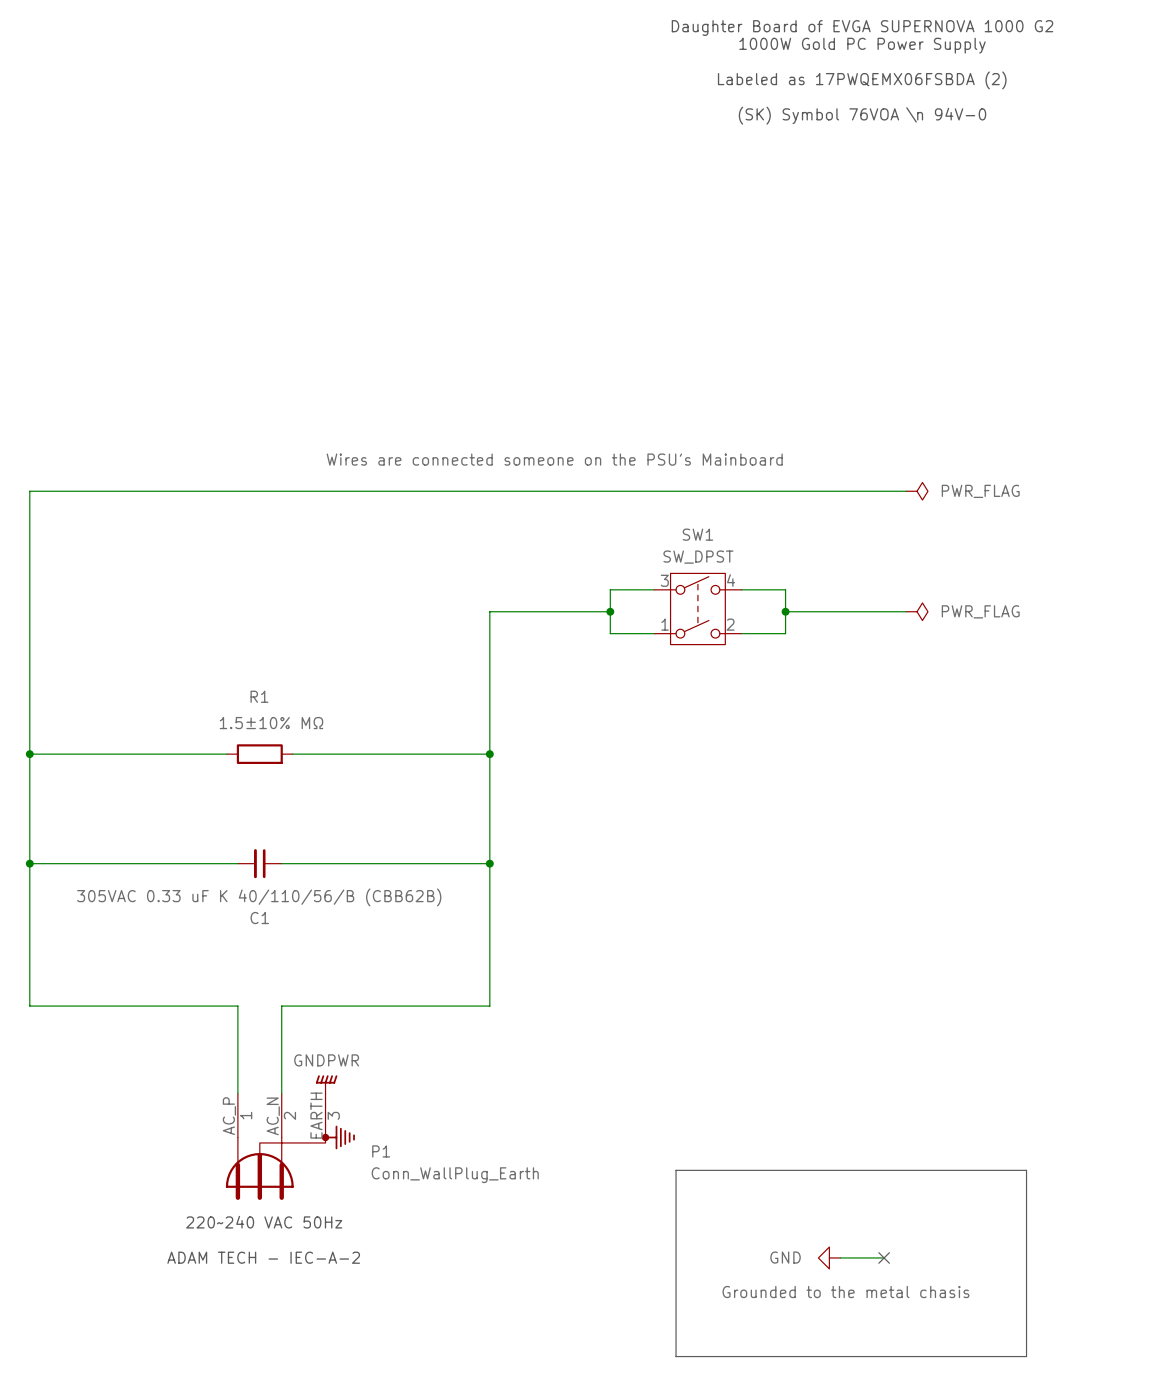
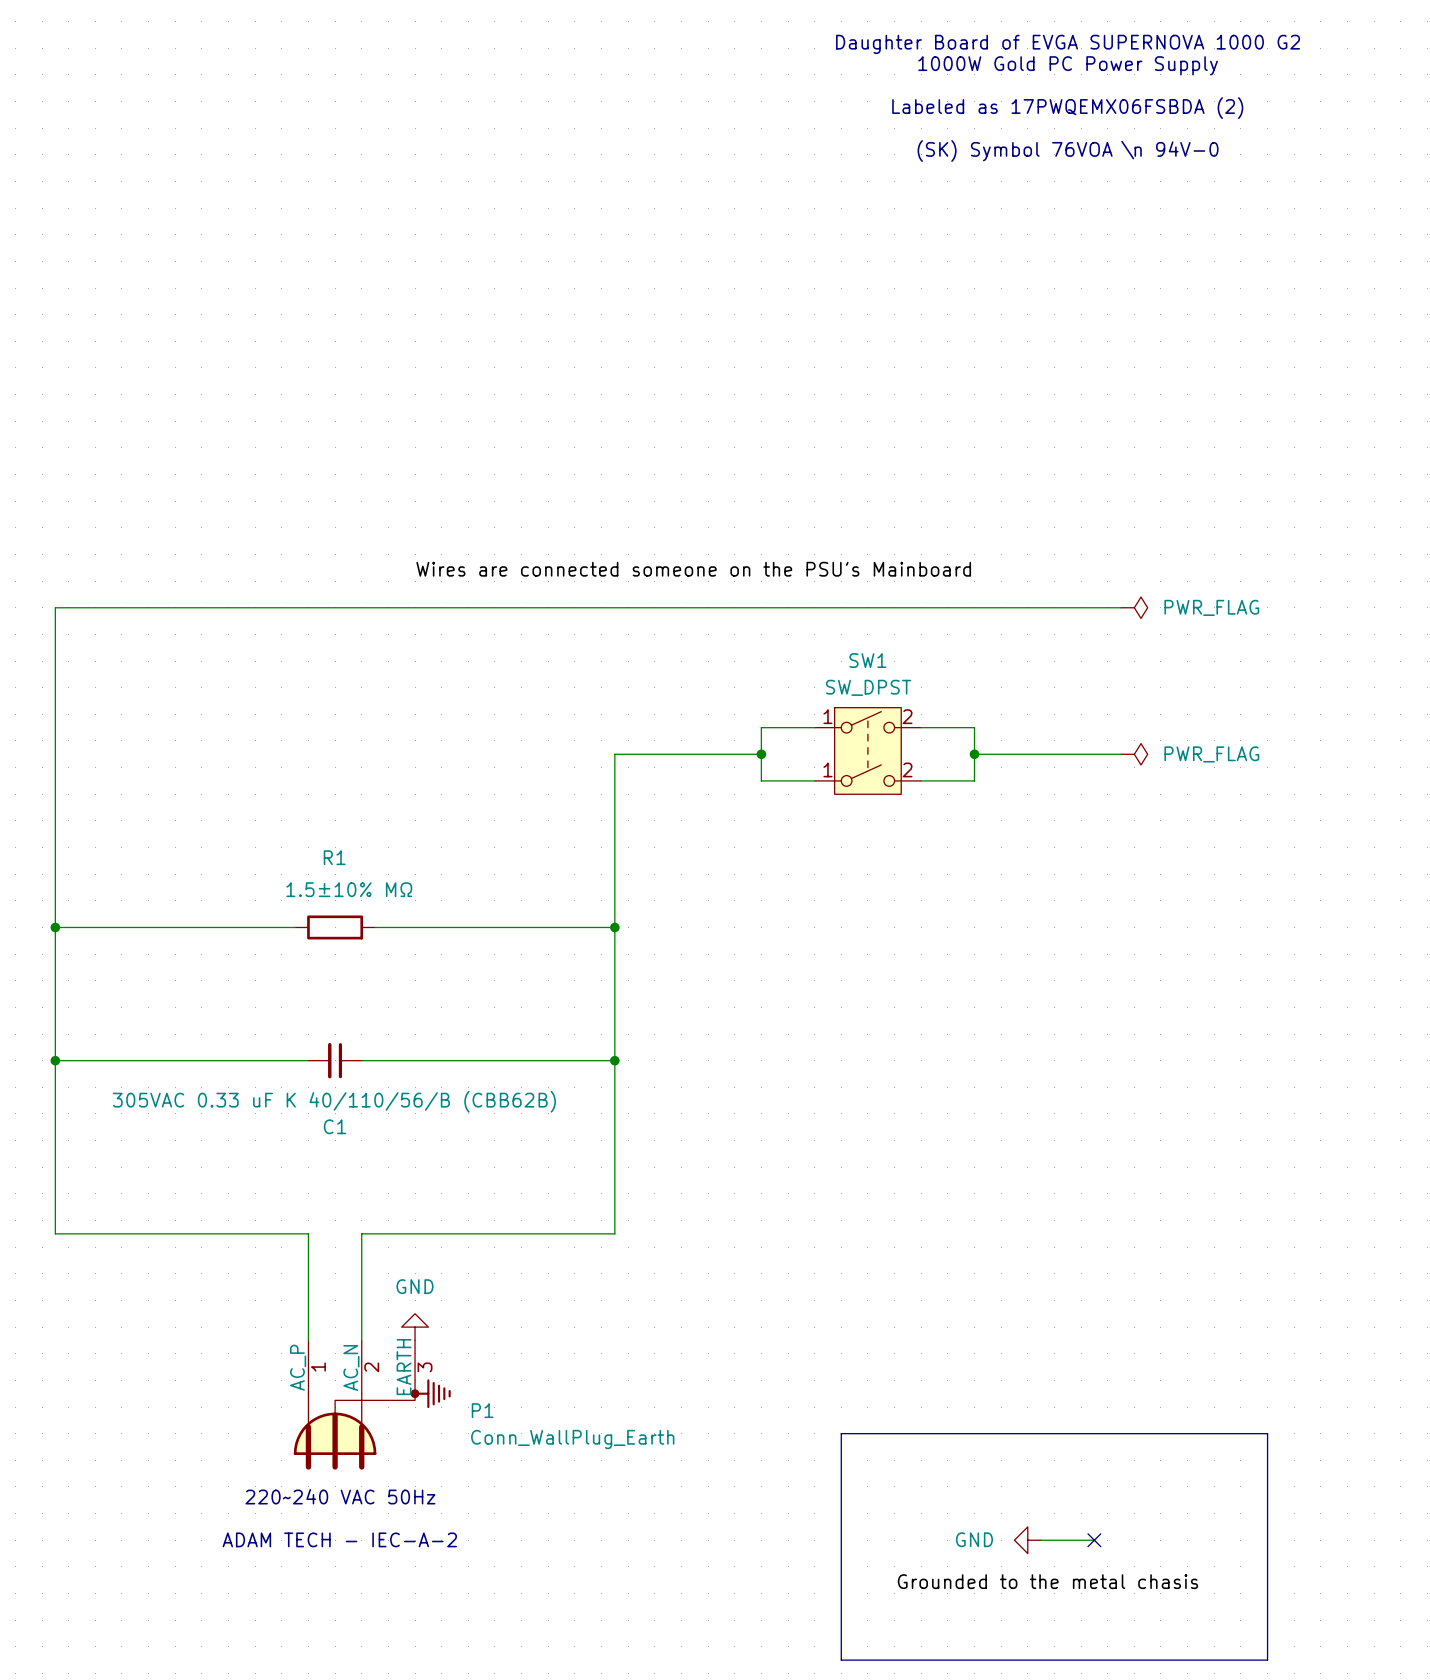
SW1 pin number: 3 (664, 580) -> 1 (827, 716)
SW1 pin number: 4 (731, 580) -> 2 (907, 716)
power symbol: GNDPWR (326, 1084) -> GND (415, 1327)

